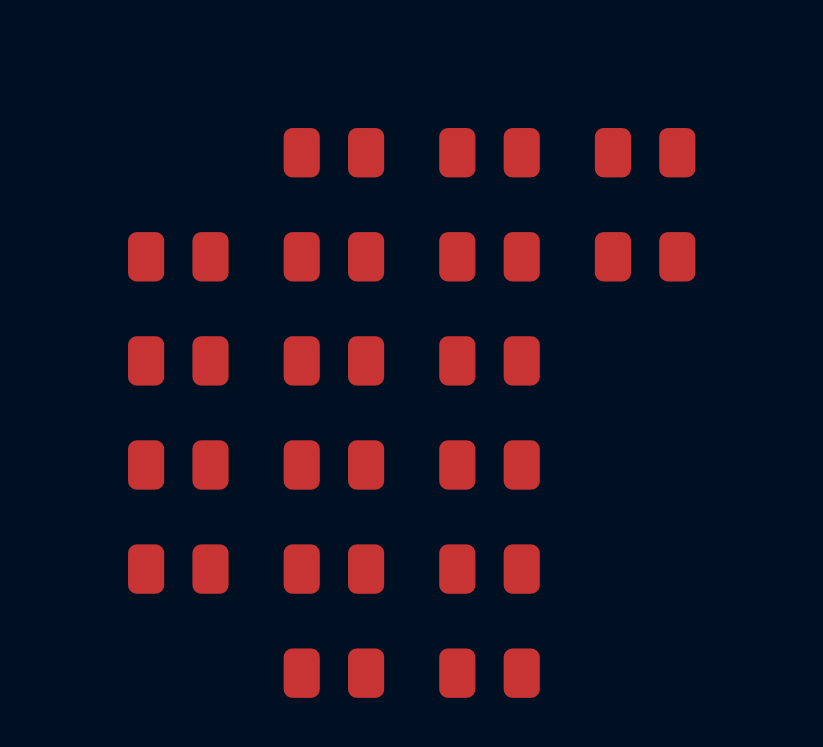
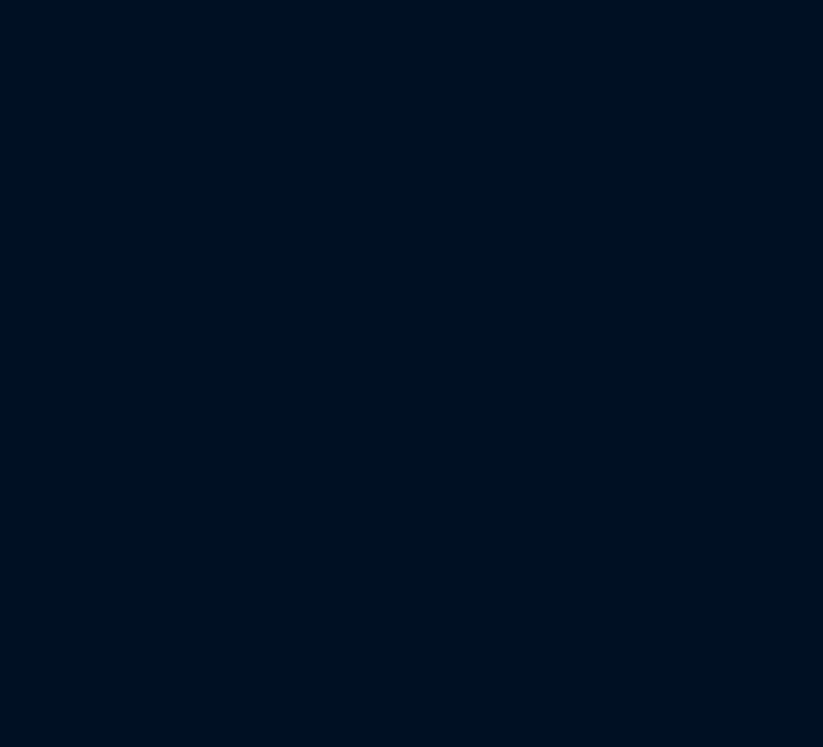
part: (333, 152) -> none
part: (489, 152) -> none
part: (645, 152) -> none
part: (178, 256) -> none
part: (333, 256) -> none
part: (489, 256) -> none
part: (645, 256) -> none
part: (178, 360) -> none
part: (333, 360) -> none
part: (489, 360) -> none
part: (178, 464) -> none
part: (333, 464) -> none
part: (489, 464) -> none
part: (178, 569) -> none
part: (333, 569) -> none
part: (489, 569) -> none
part: (333, 673) -> none
part: (489, 673) -> none

